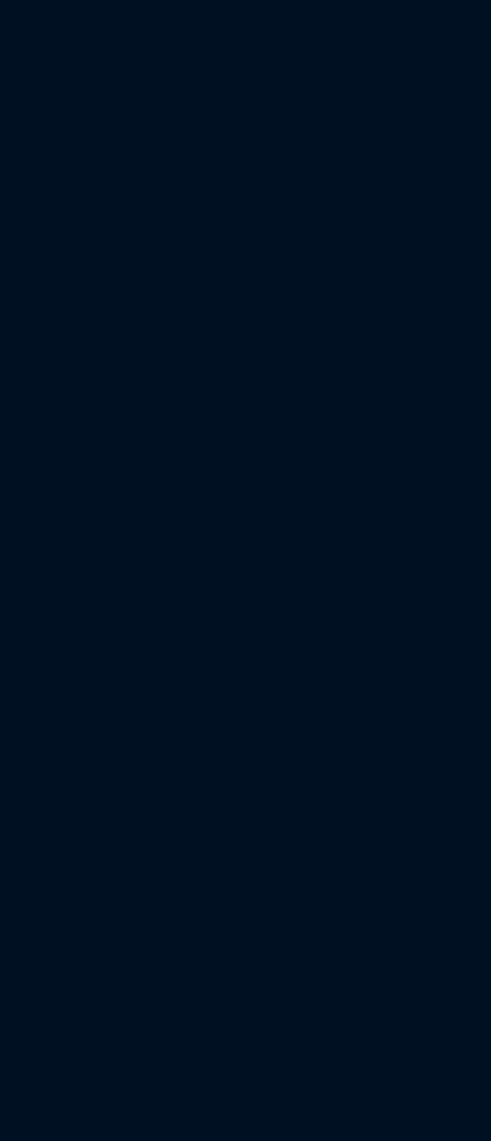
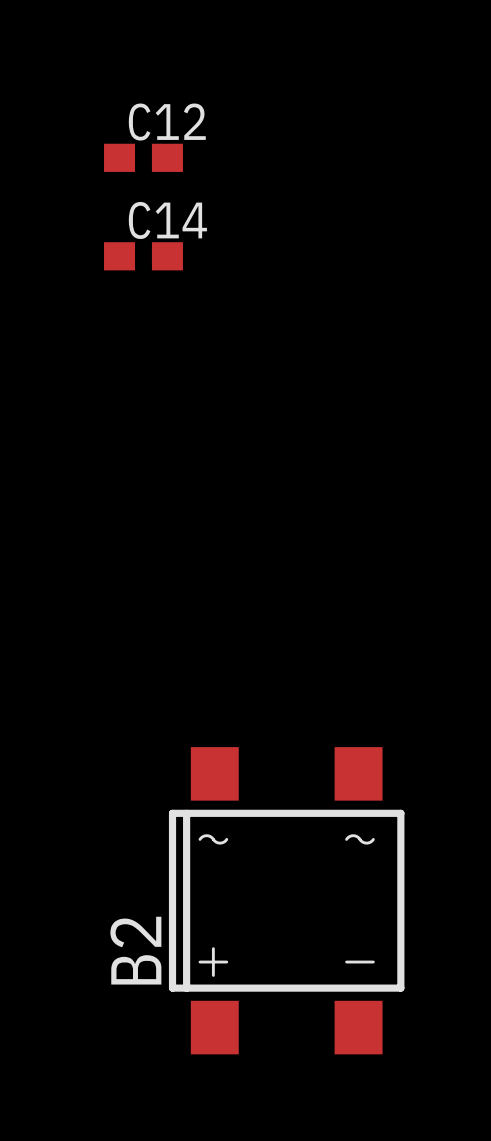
C12: none -> (143, 157)
C14: none -> (143, 256)
B2: none -> (286, 900)

